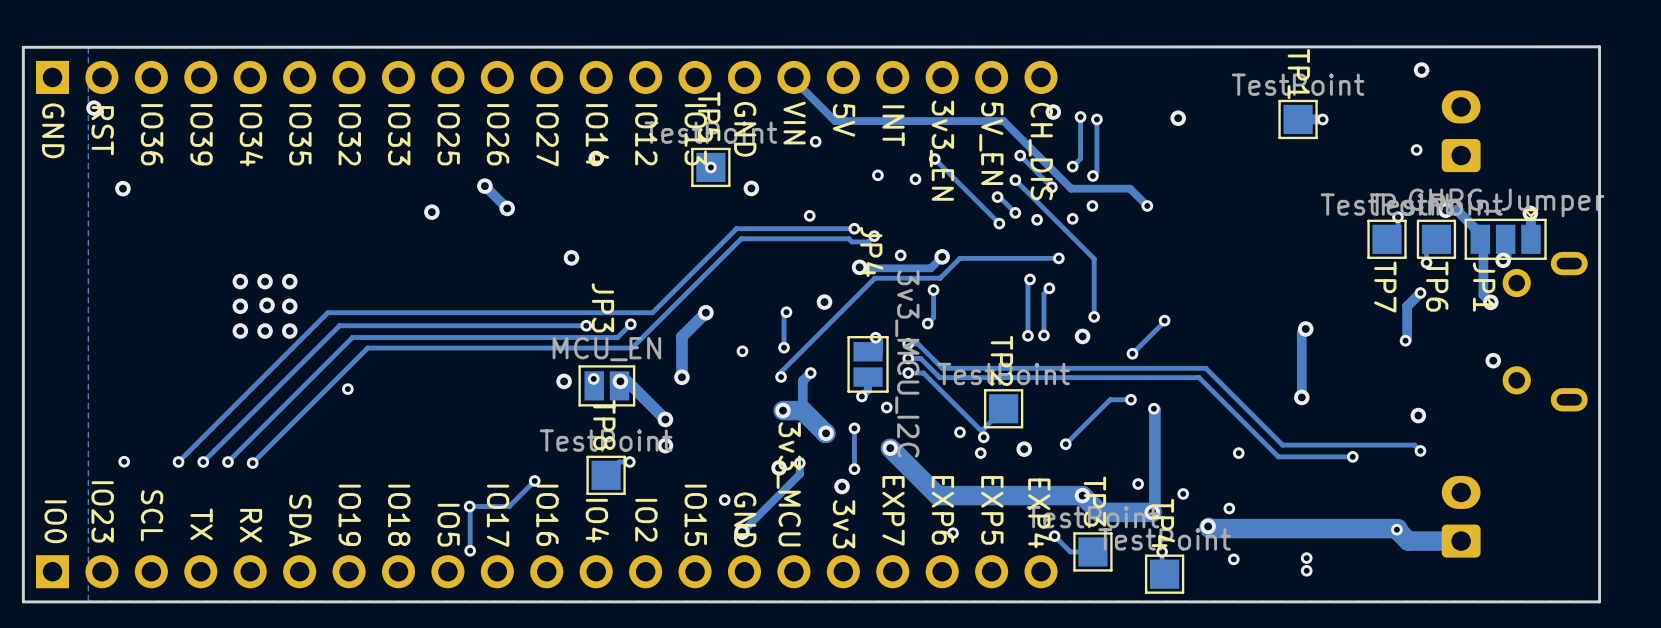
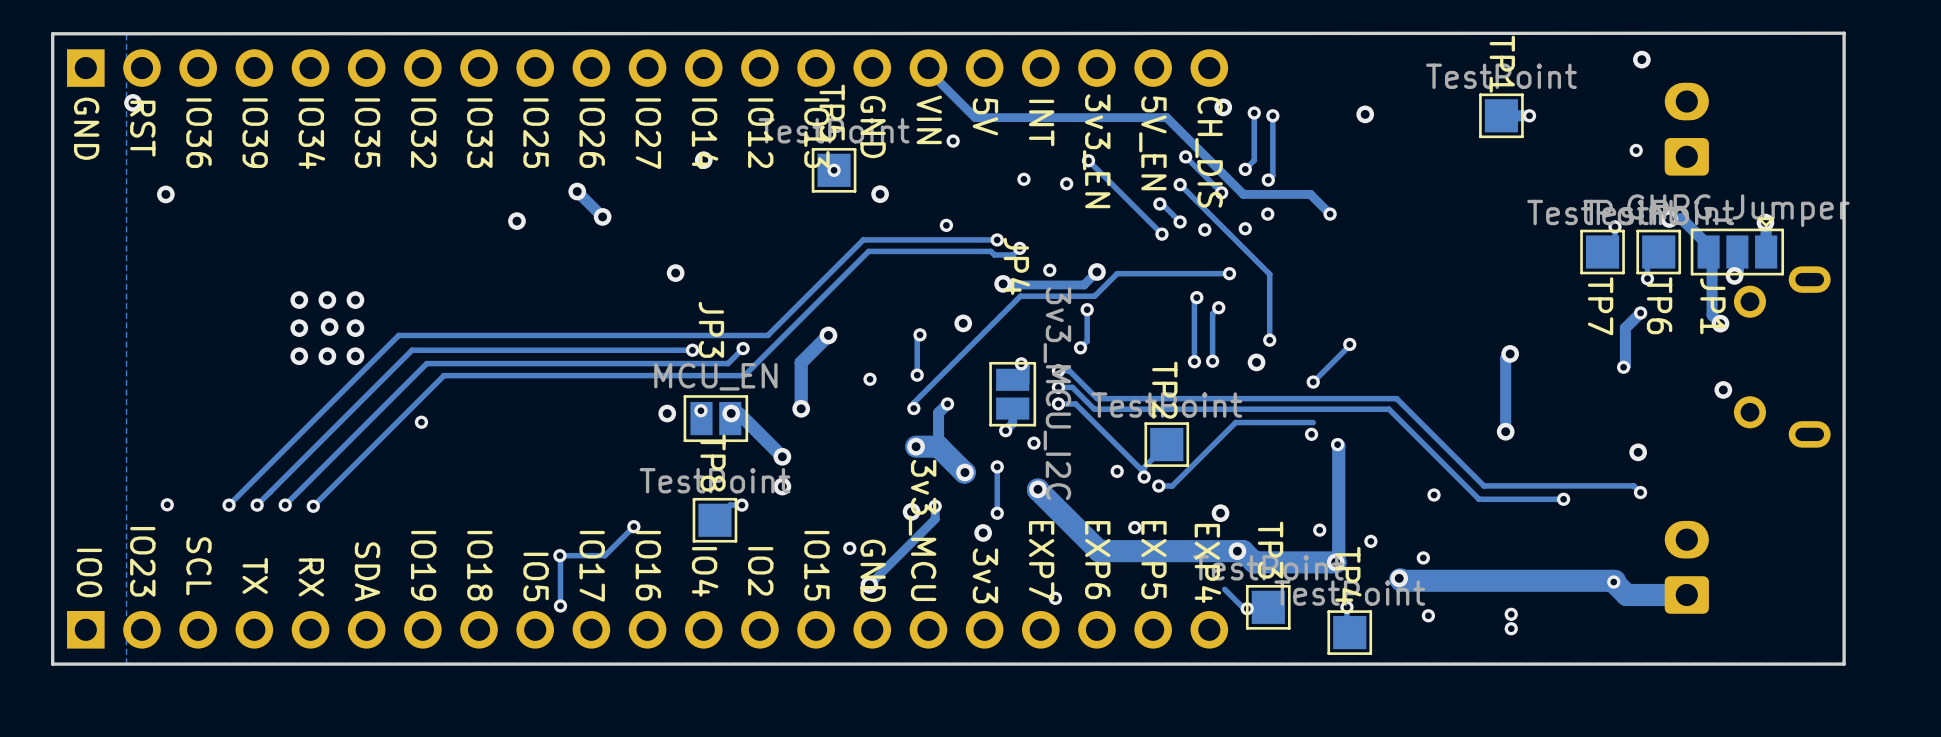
track: none -> (1313, 422) (1235, 422) (1172, 486) (1158, 486)
track: (1130, 399) (1110, 399) (1065, 444) -> none
via: (1065, 444) -> none
via: none -> (1158, 486)
track: (890, 448) (937, 495) (1082, 495) (1099, 512) -> (1037, 489) (1099, 551) (1243, 551) (1254, 562) (1275, 562)
via: (1024, 449) -> none
via: (980, 453) -> none
via: none -> (1220, 513)
via: none -> (1134, 527)
via position: (1082, 495) -> (1237, 551)
via: (953, 533) -> none
via position: (1054, 536) -> (1247, 608)
via: none -> (1055, 598)

